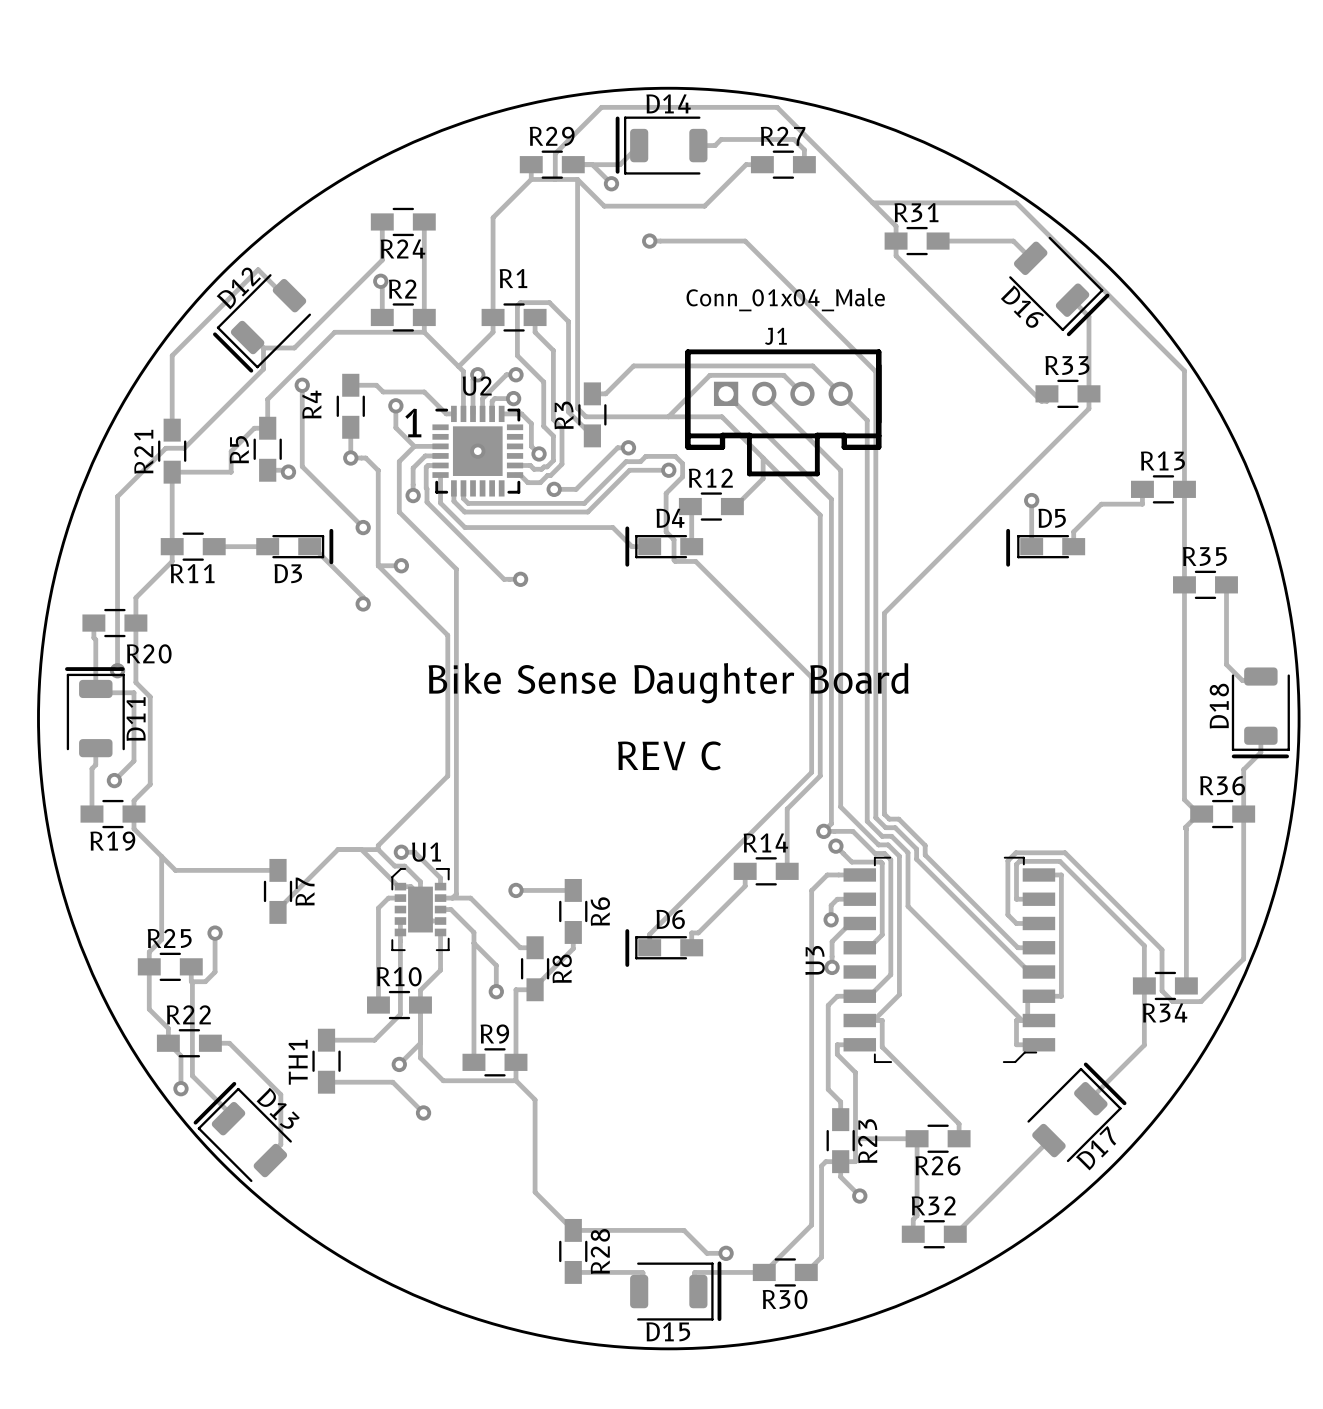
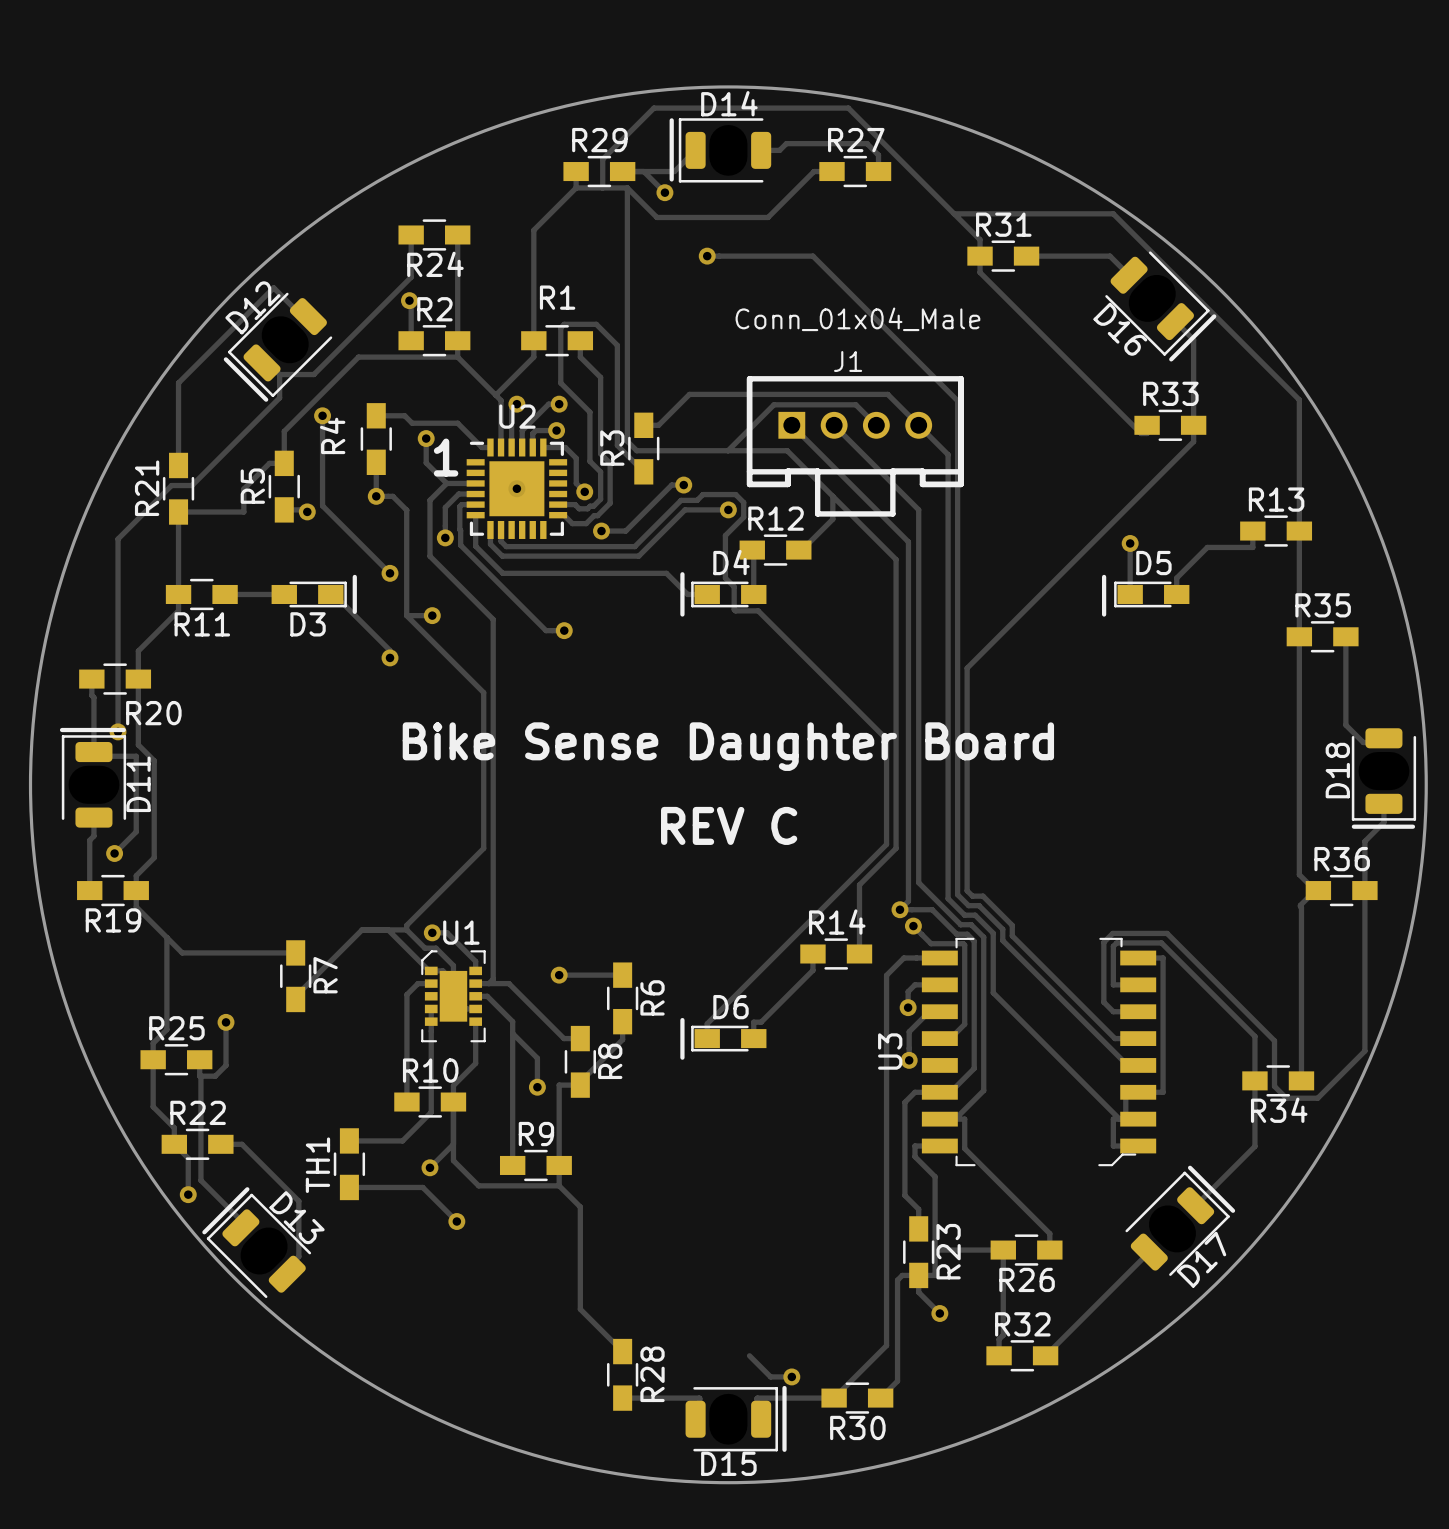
track: (573, 1230) (684, 1230) (687, 1234) -> none

